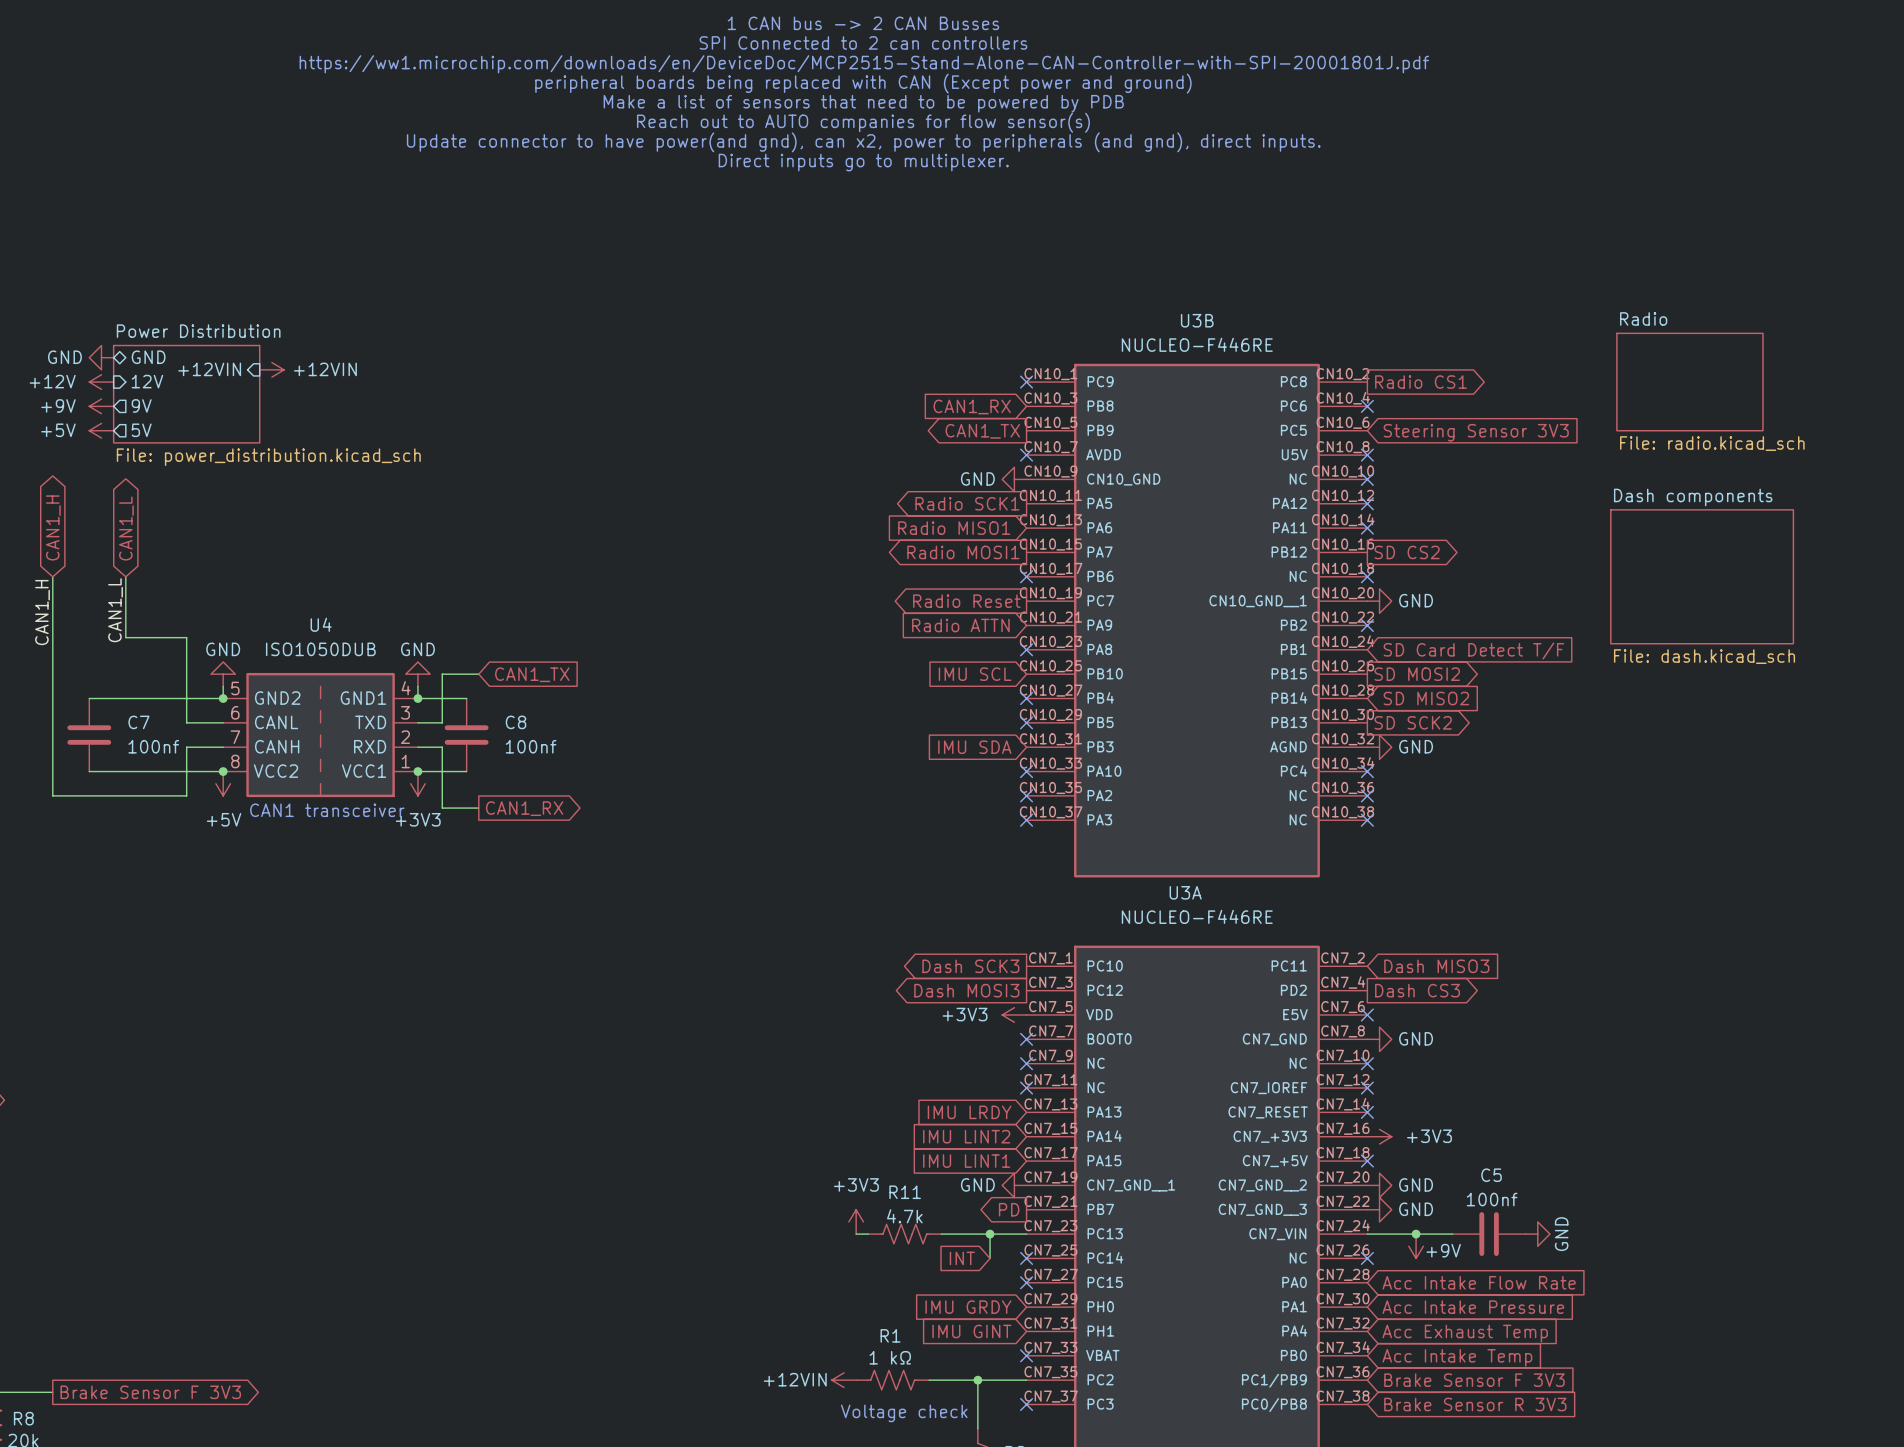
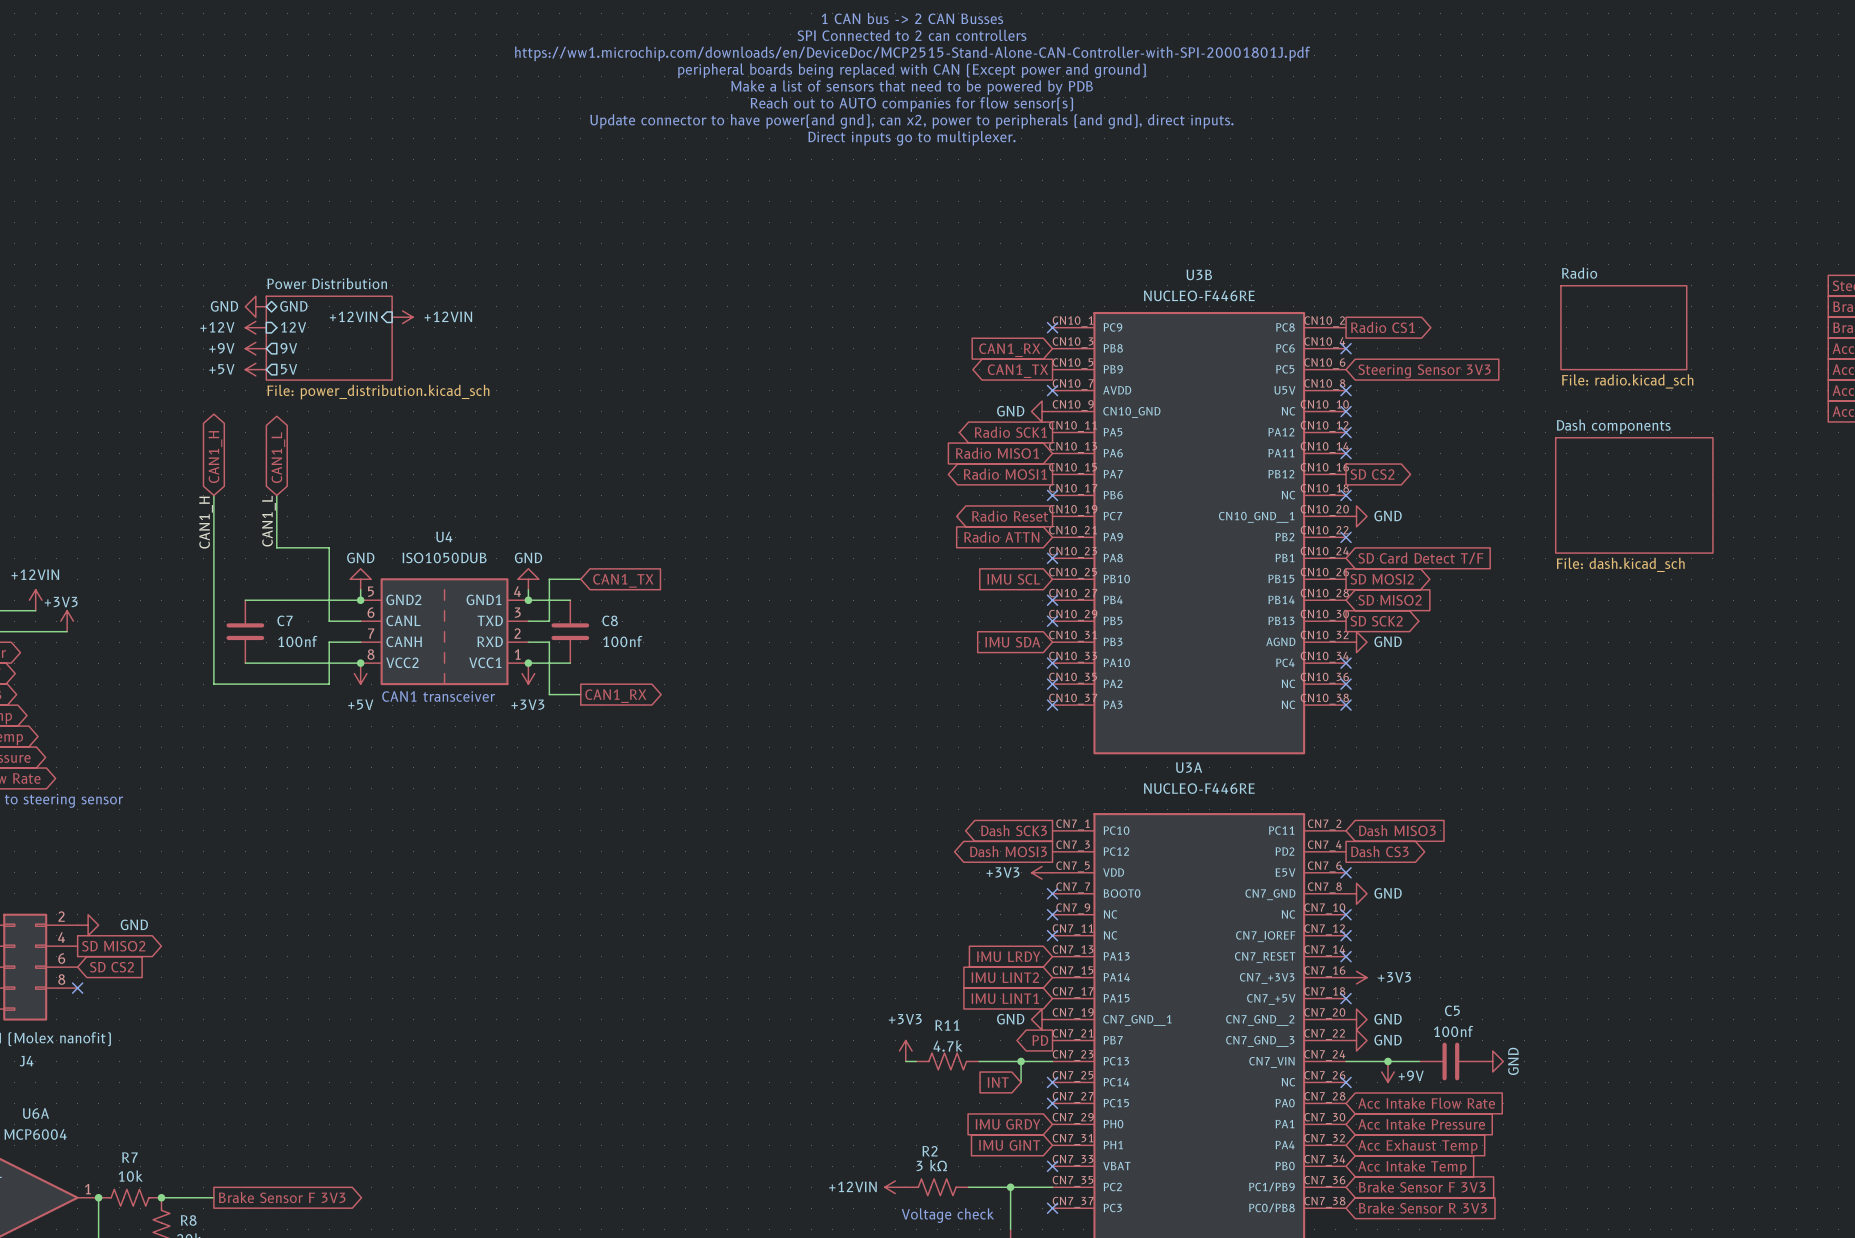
R1 name: R1 (890, 1335) -> R2 (930, 1151)
R1 value: 1 kΩ (890, 1357) -> 3 kΩ (931, 1165)

